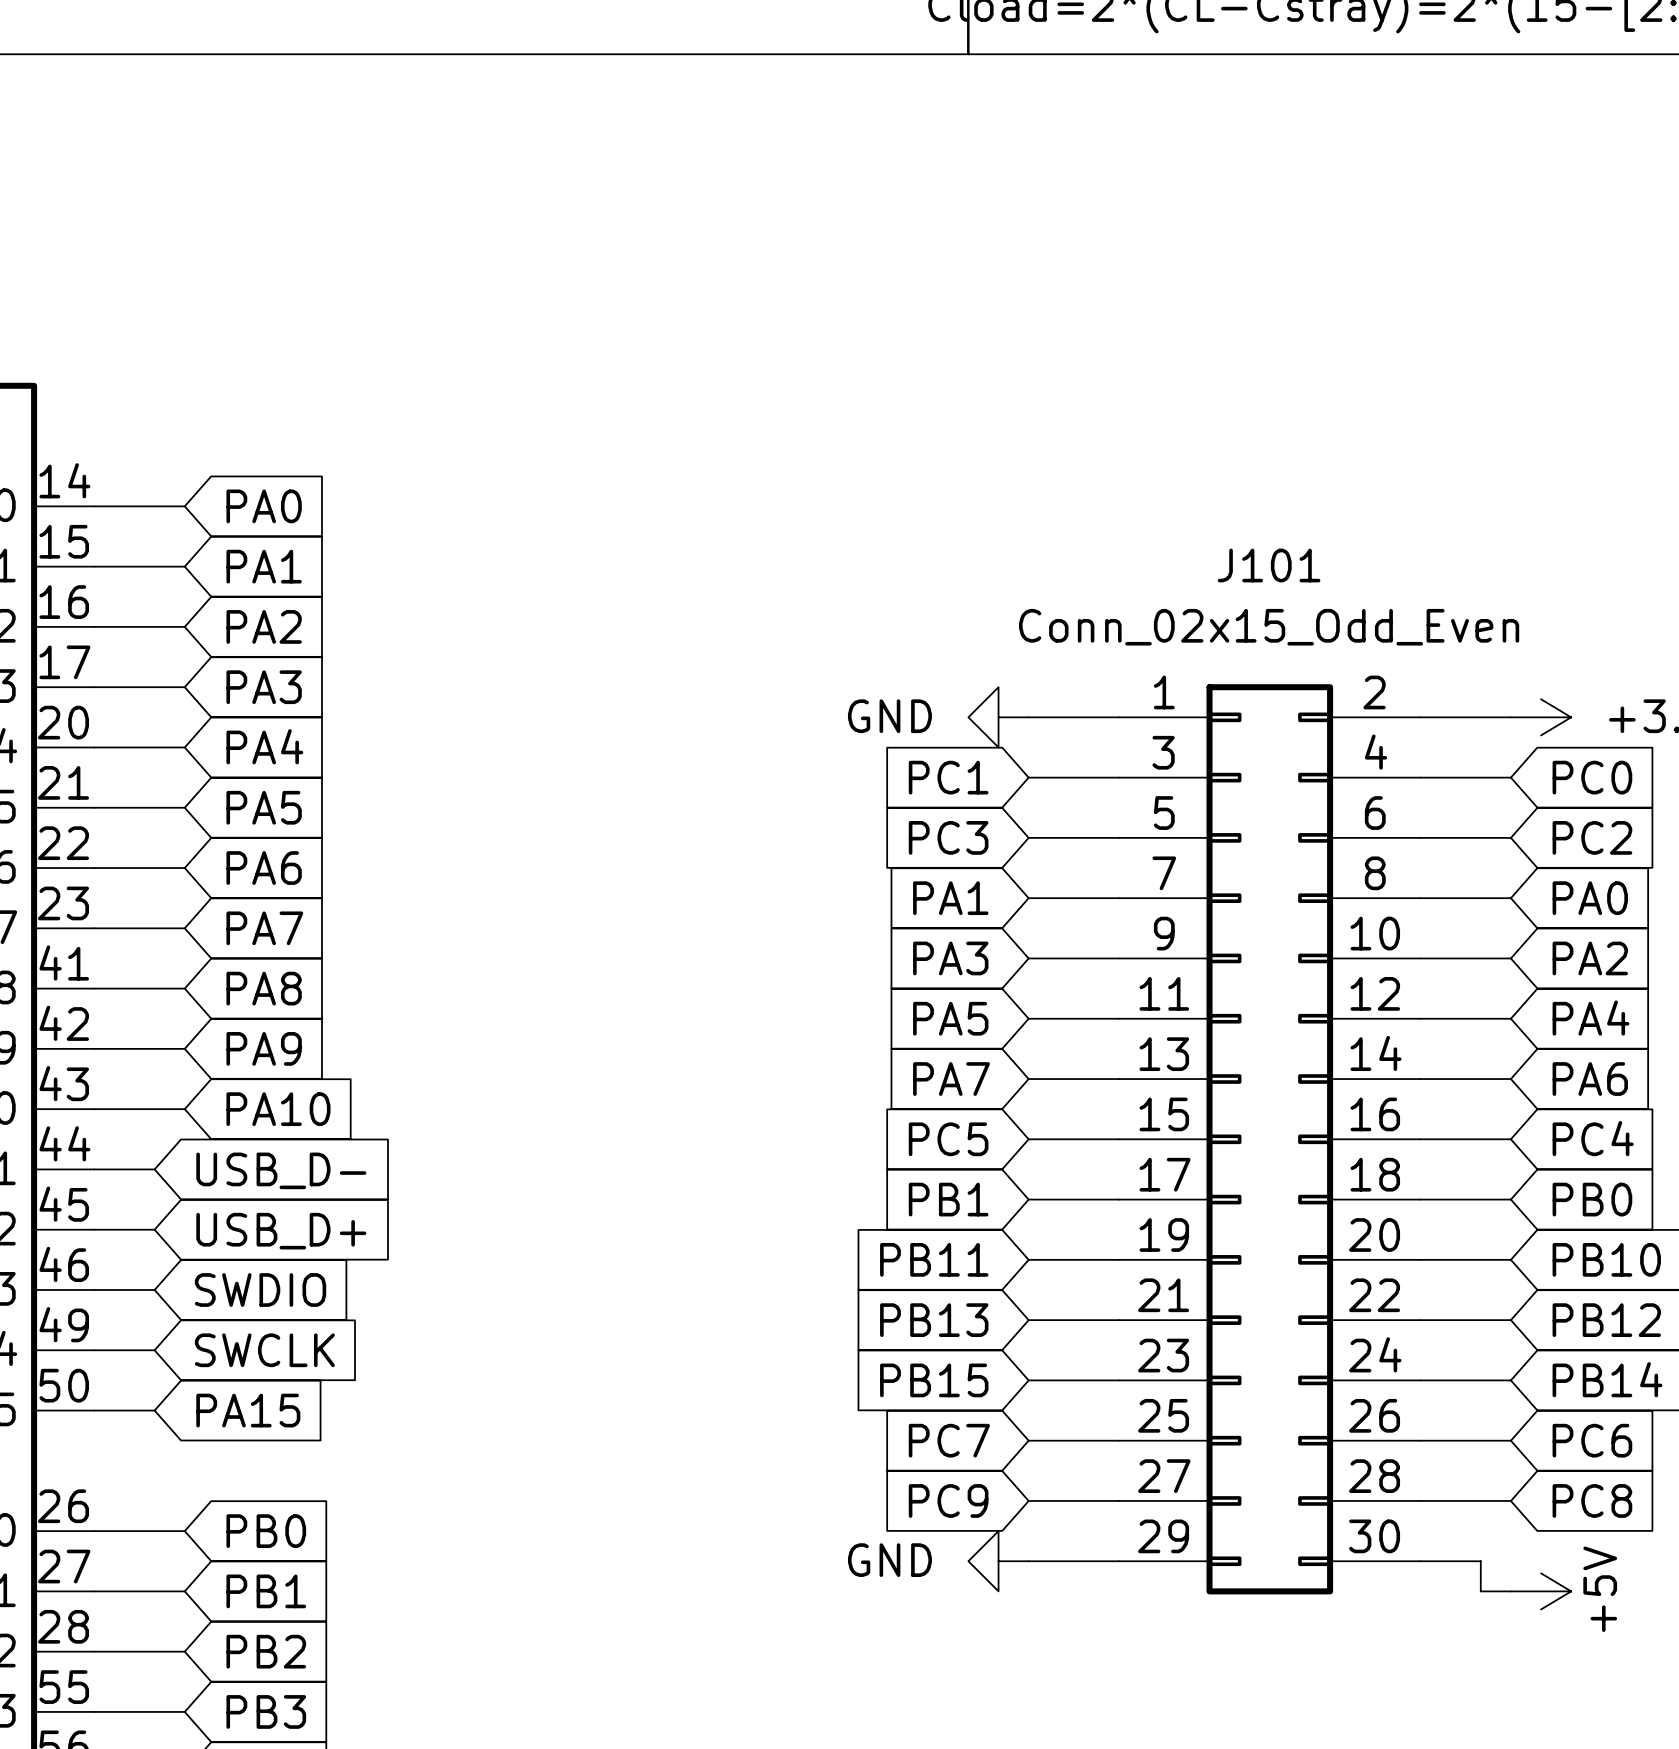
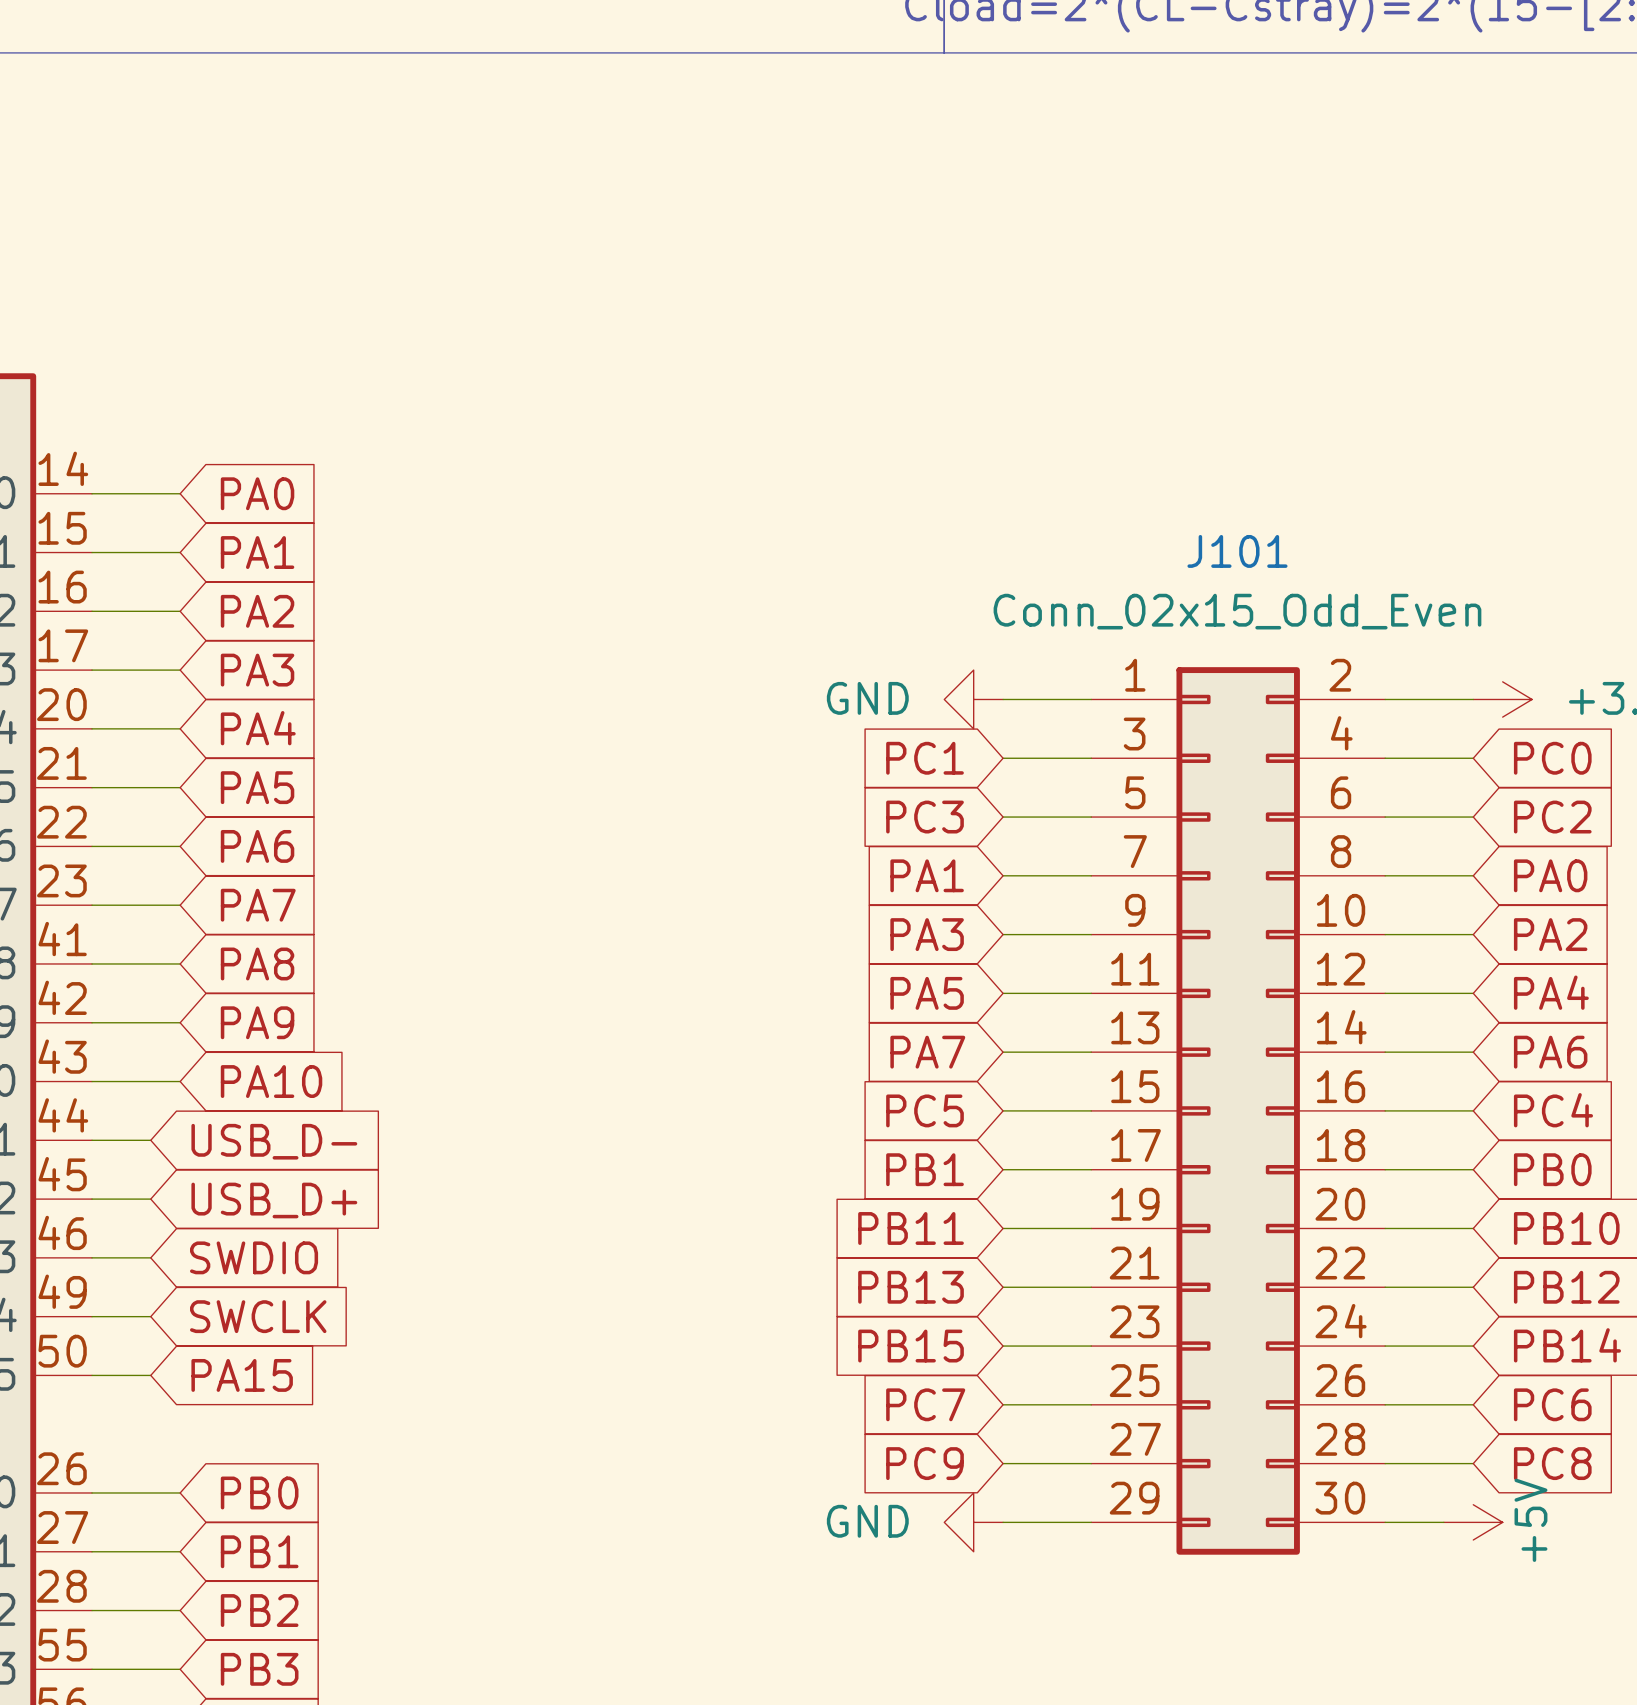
wire: (1480, 1561) (1480, 1591) (1510, 1591) -> none
power symbol position: +5V (1541, 1591) -> +5V (1473, 1522)

